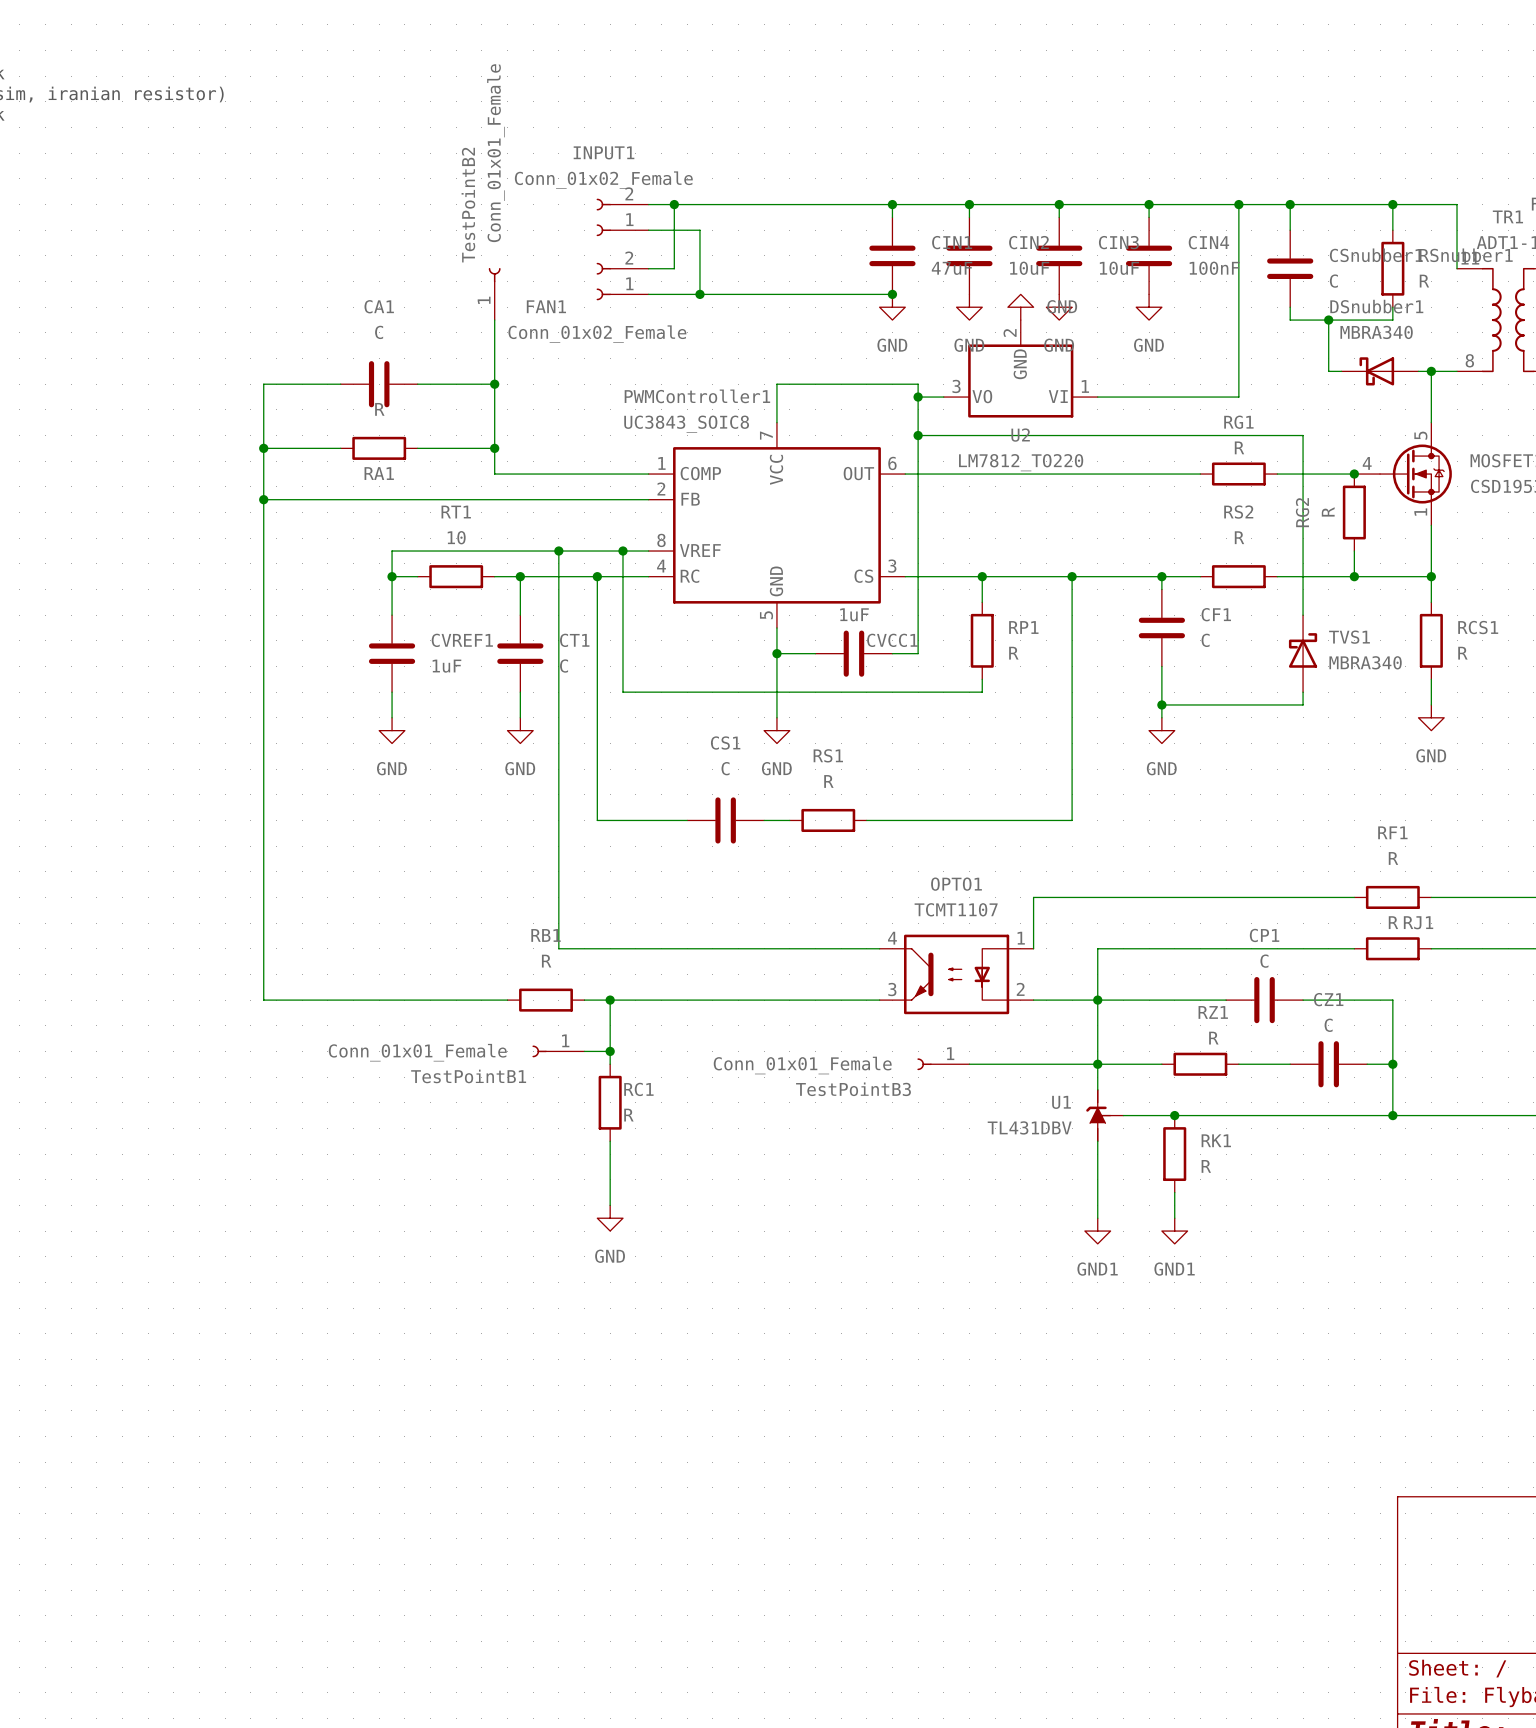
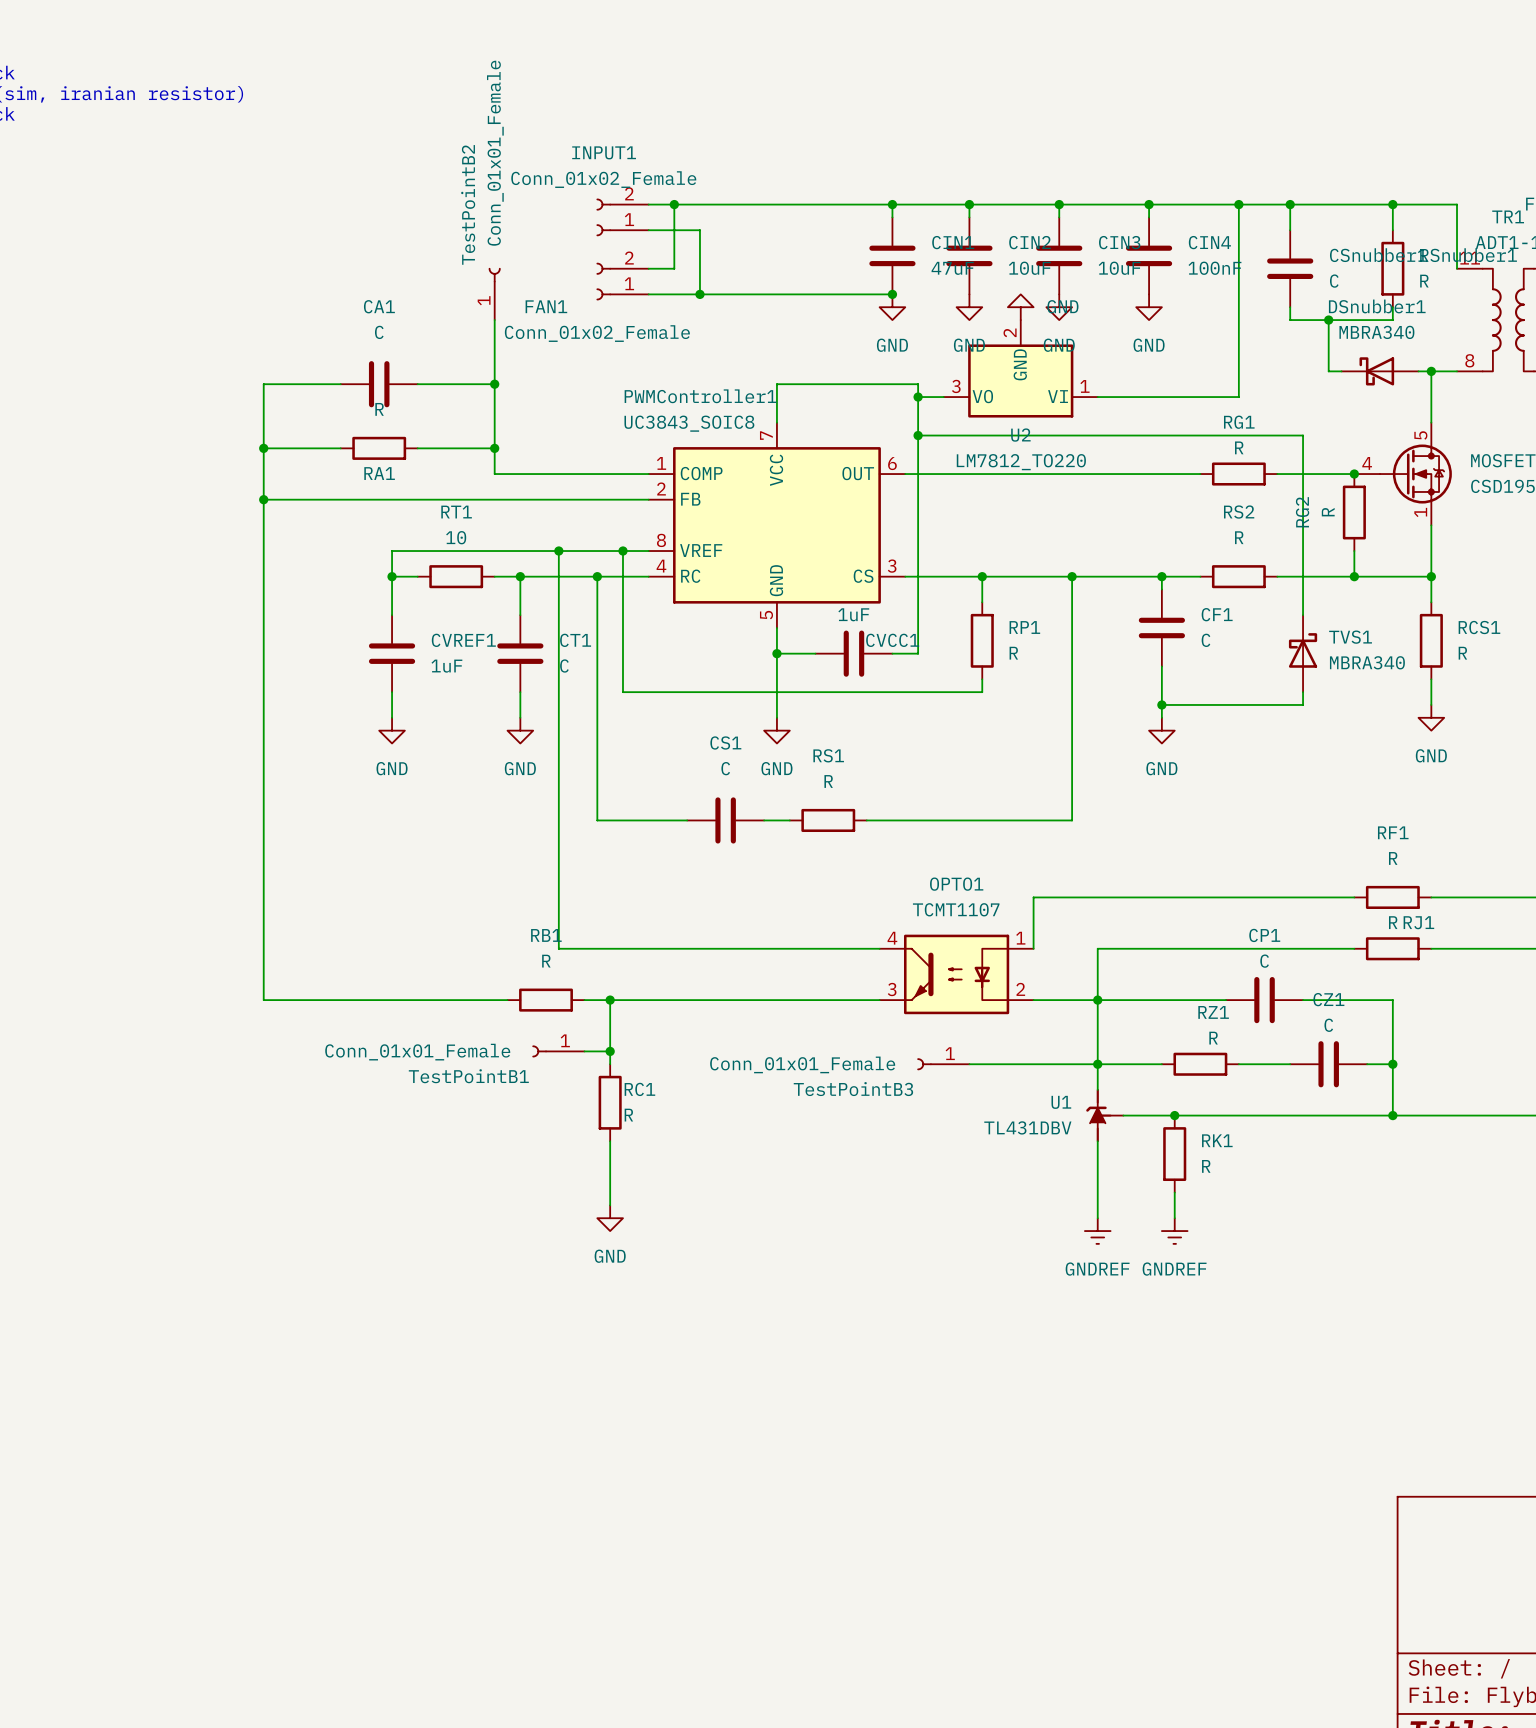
power symbol: GND1 (1097, 1231) -> GNDREF (1097, 1231)
power symbol: GND1 (1174, 1231) -> GNDREF (1174, 1231)

